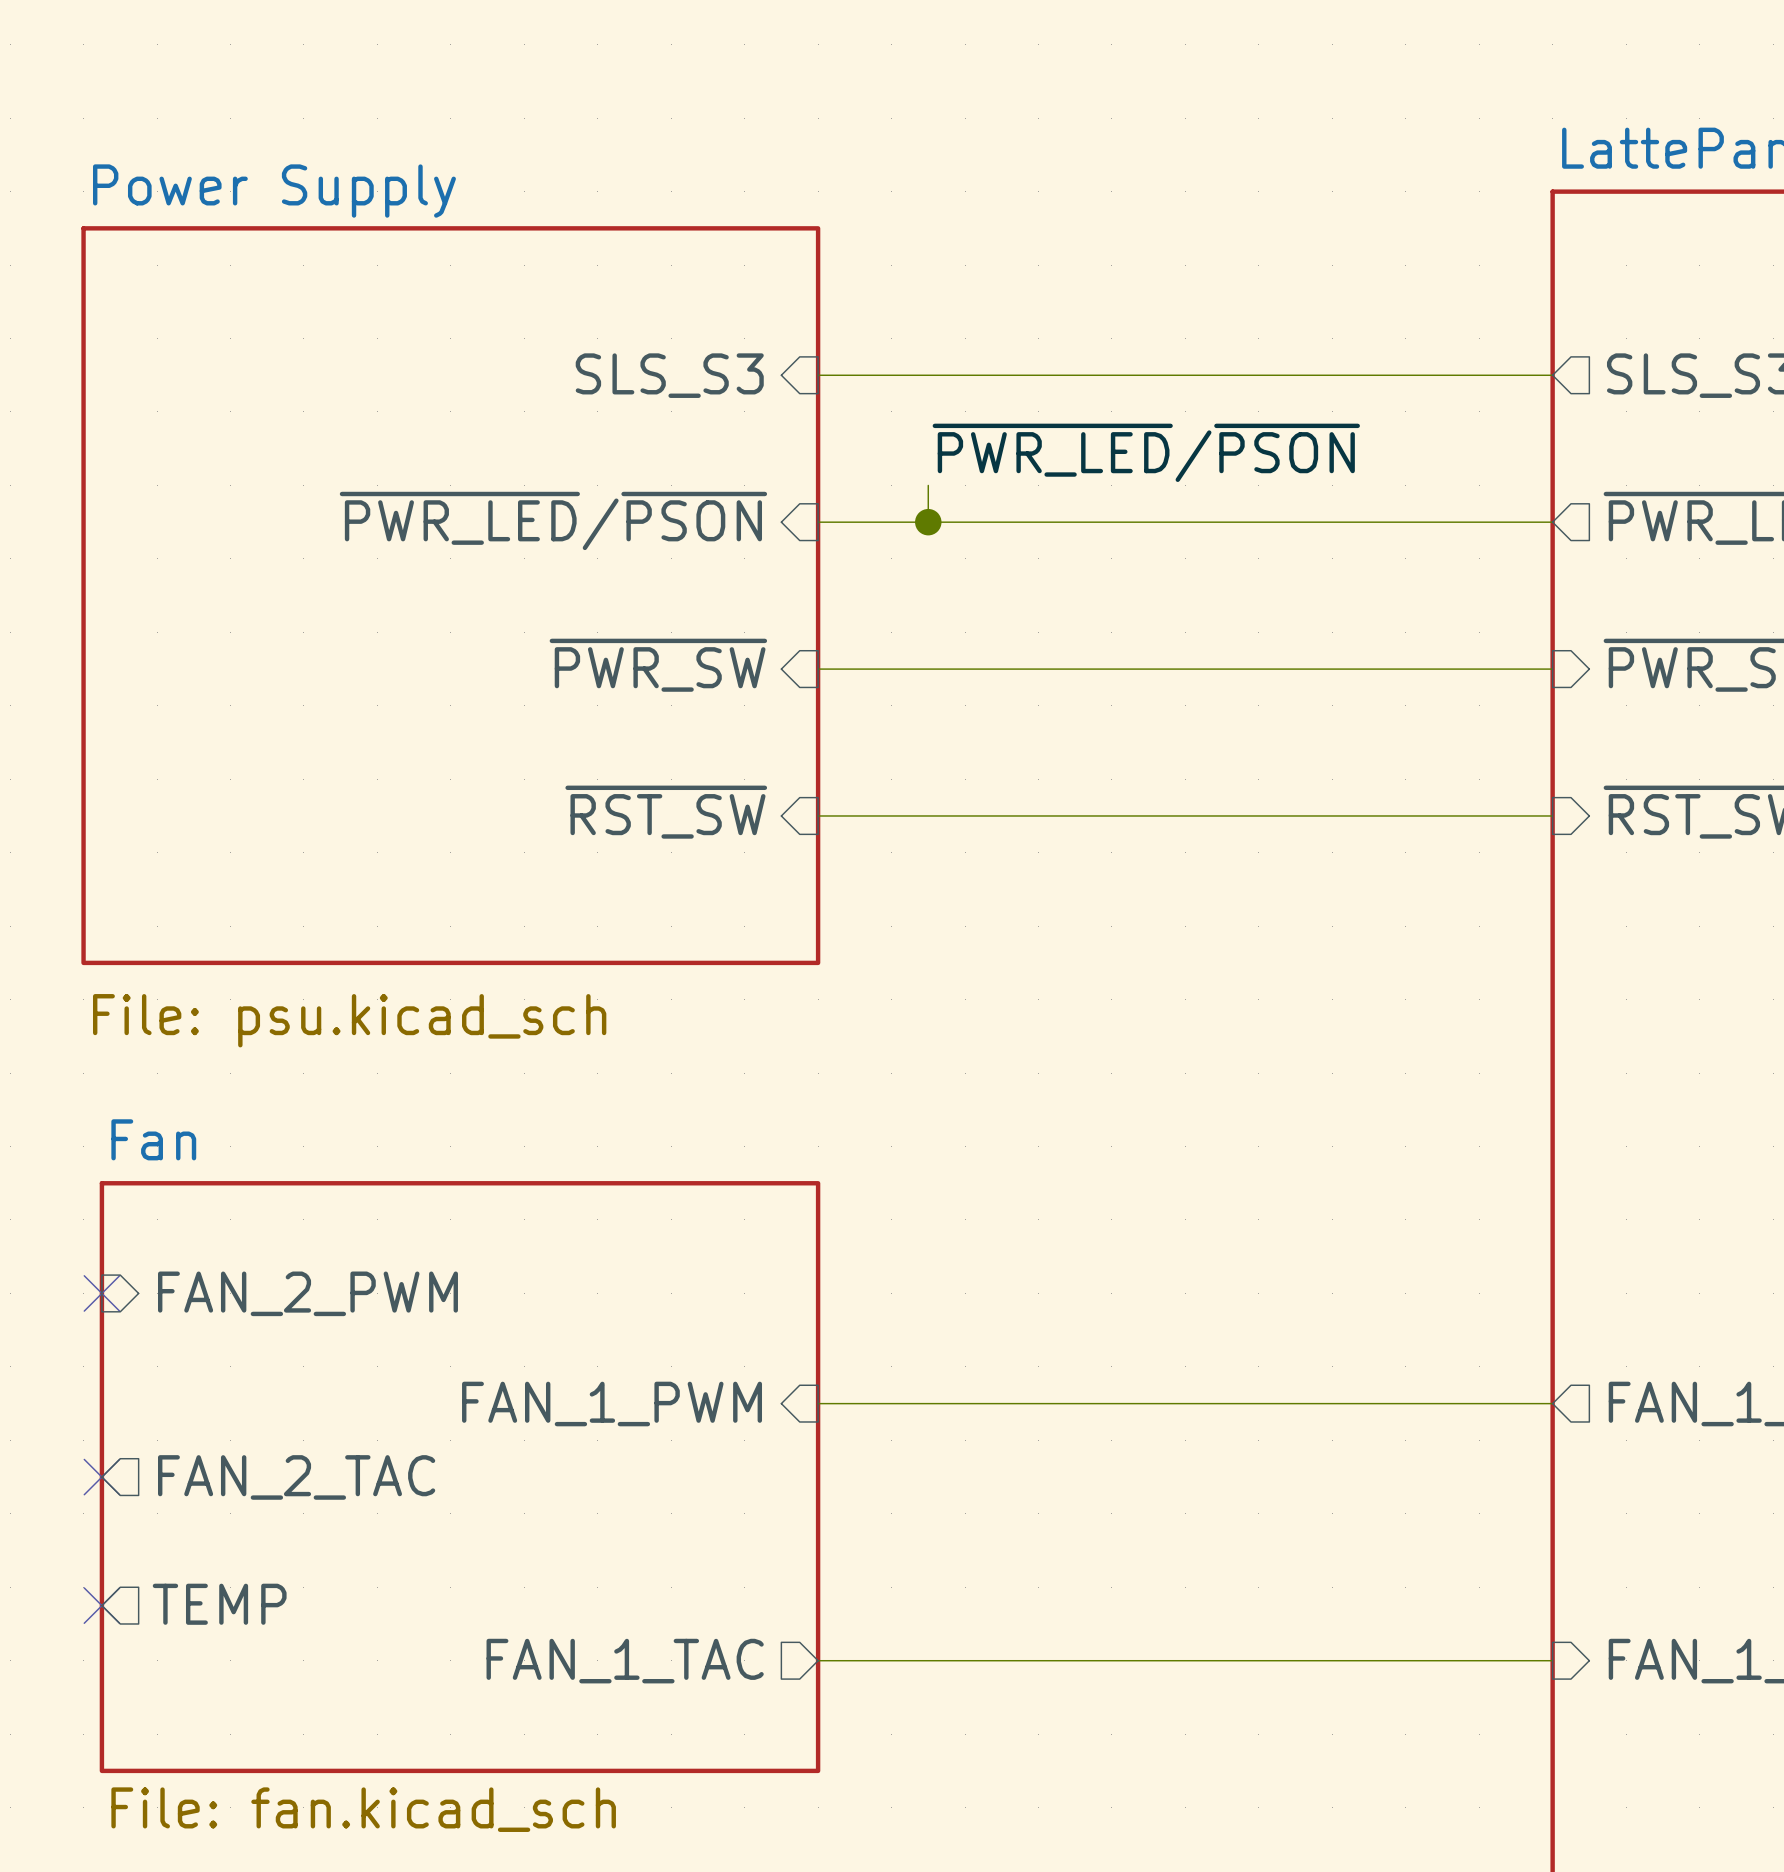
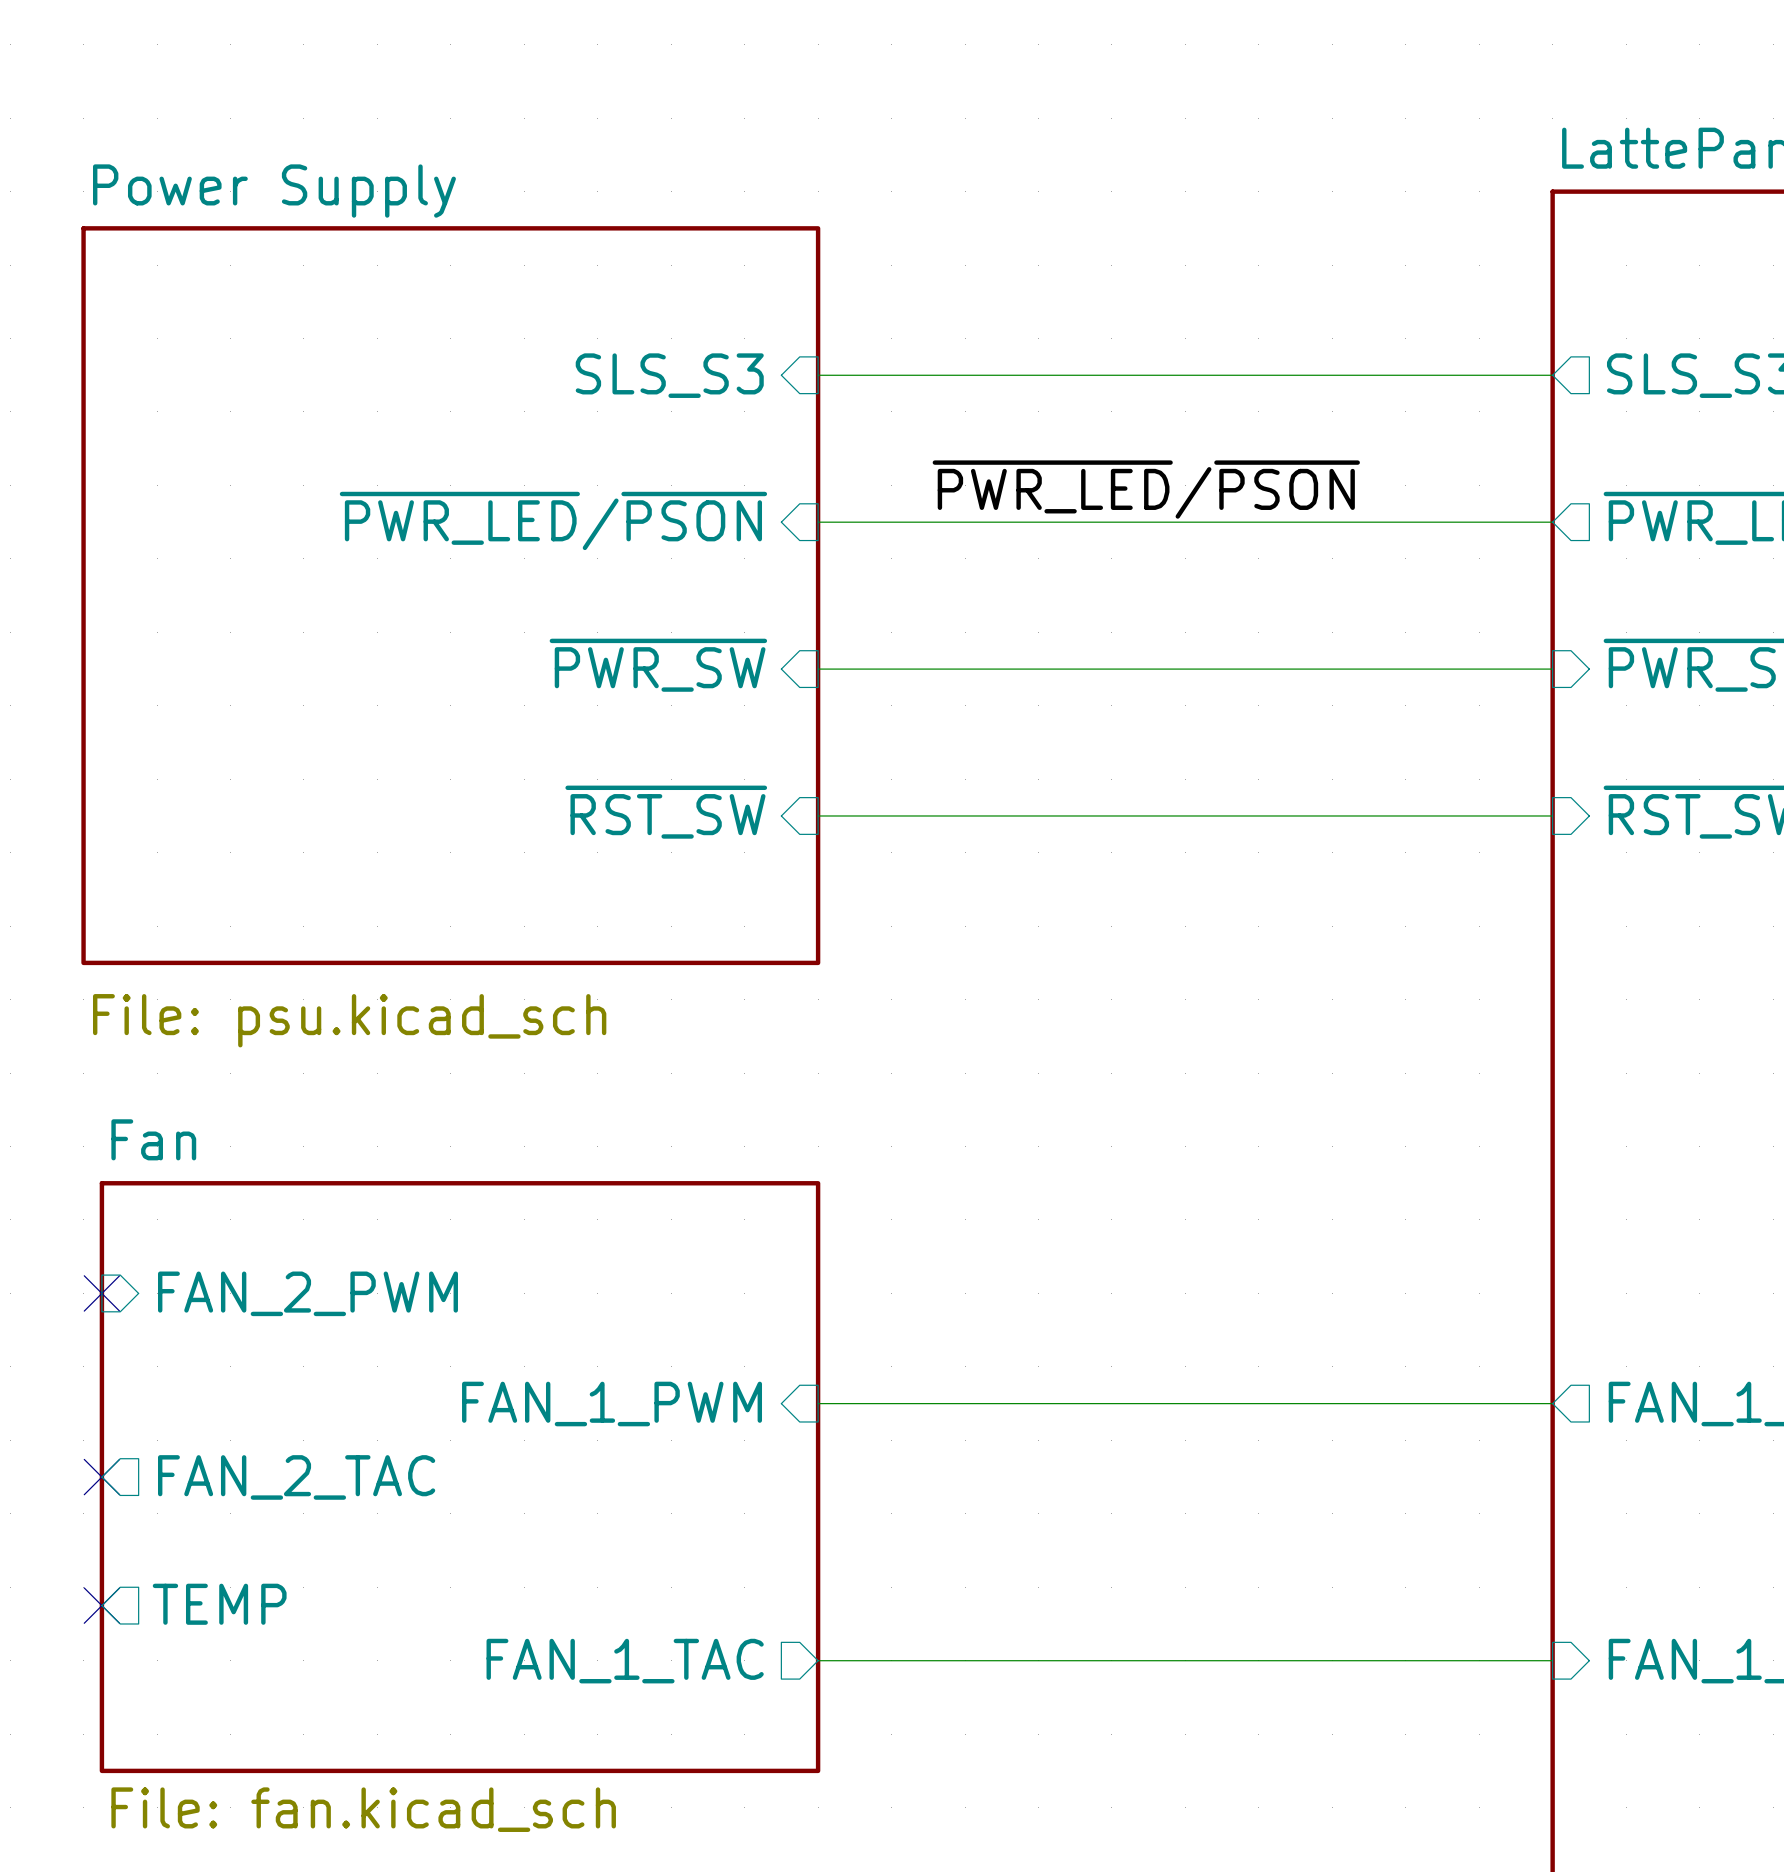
label position: ~{PWR_LED}/~{PSON} (1146, 452) -> ~{PWR_LED}/~{PSON} (1146, 489)
wire: (928, 485) (928, 522) -> none
junction: (928, 522) -> none

